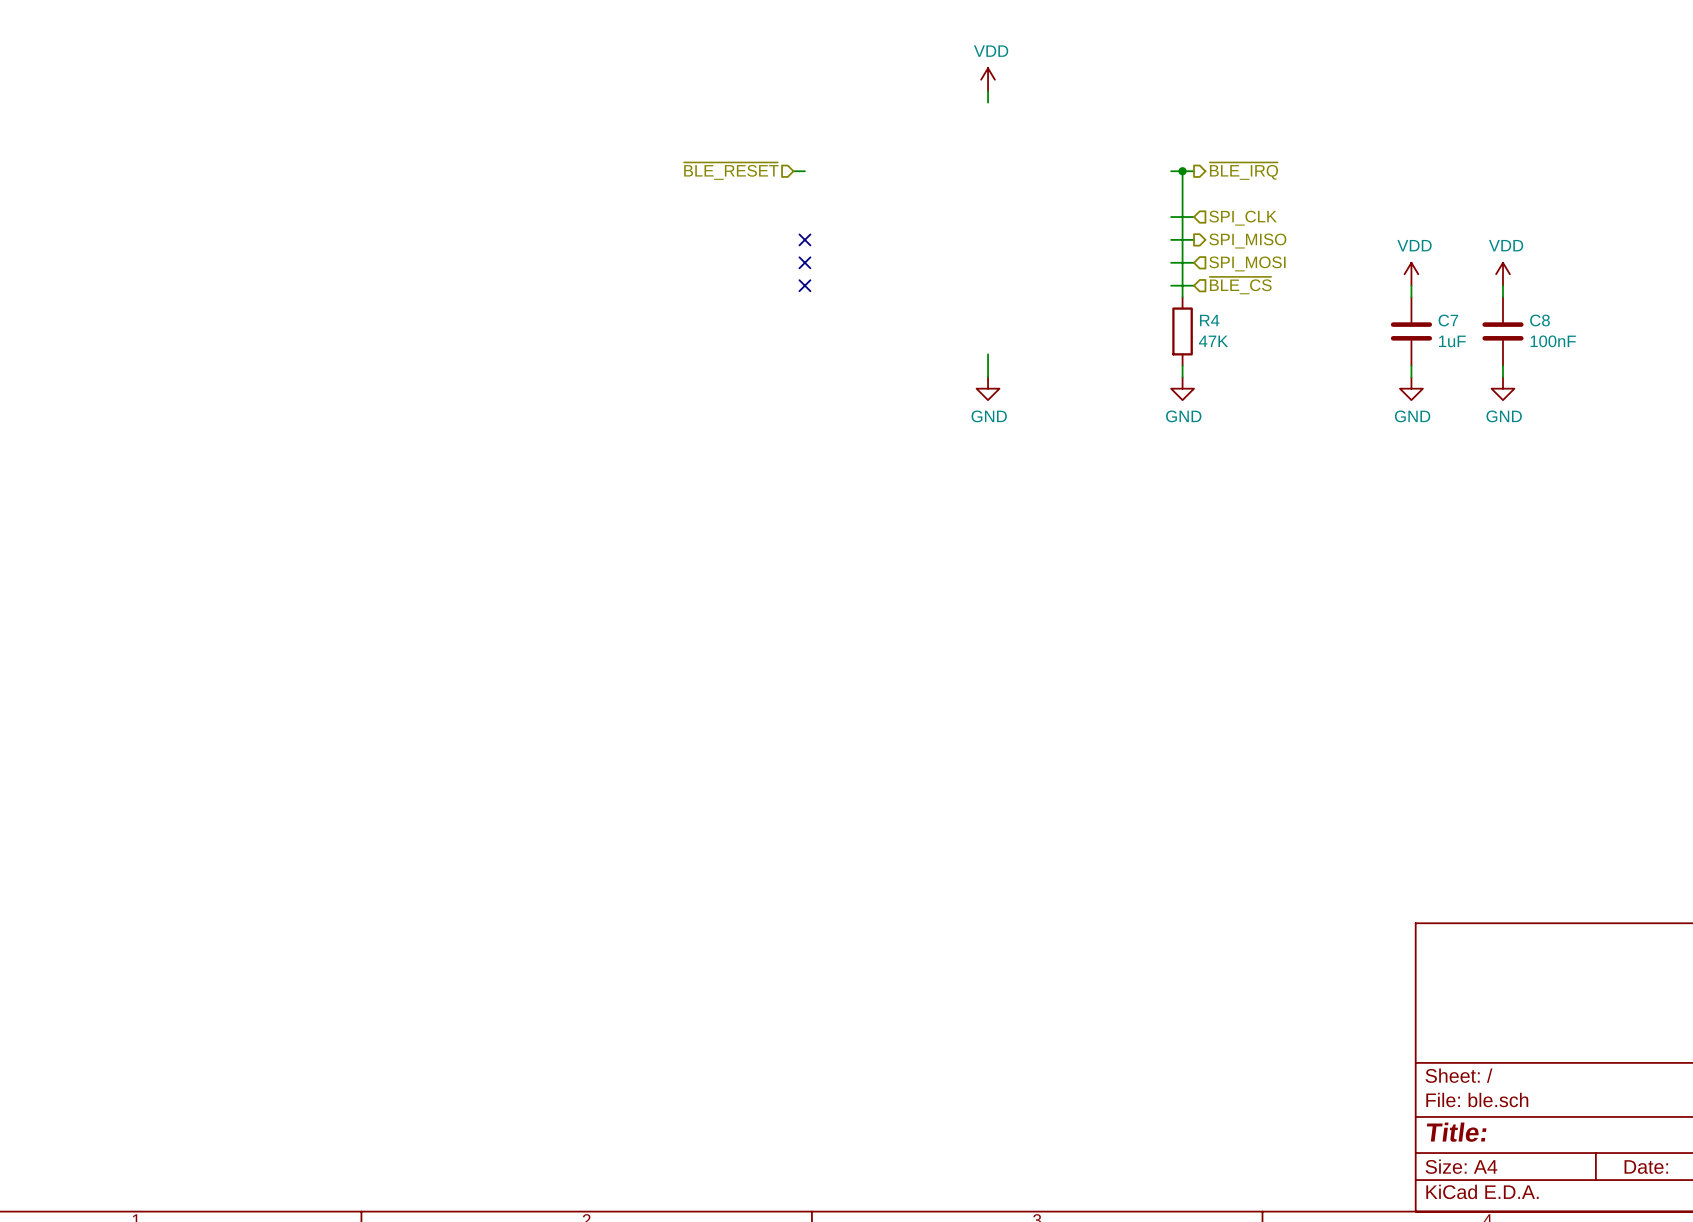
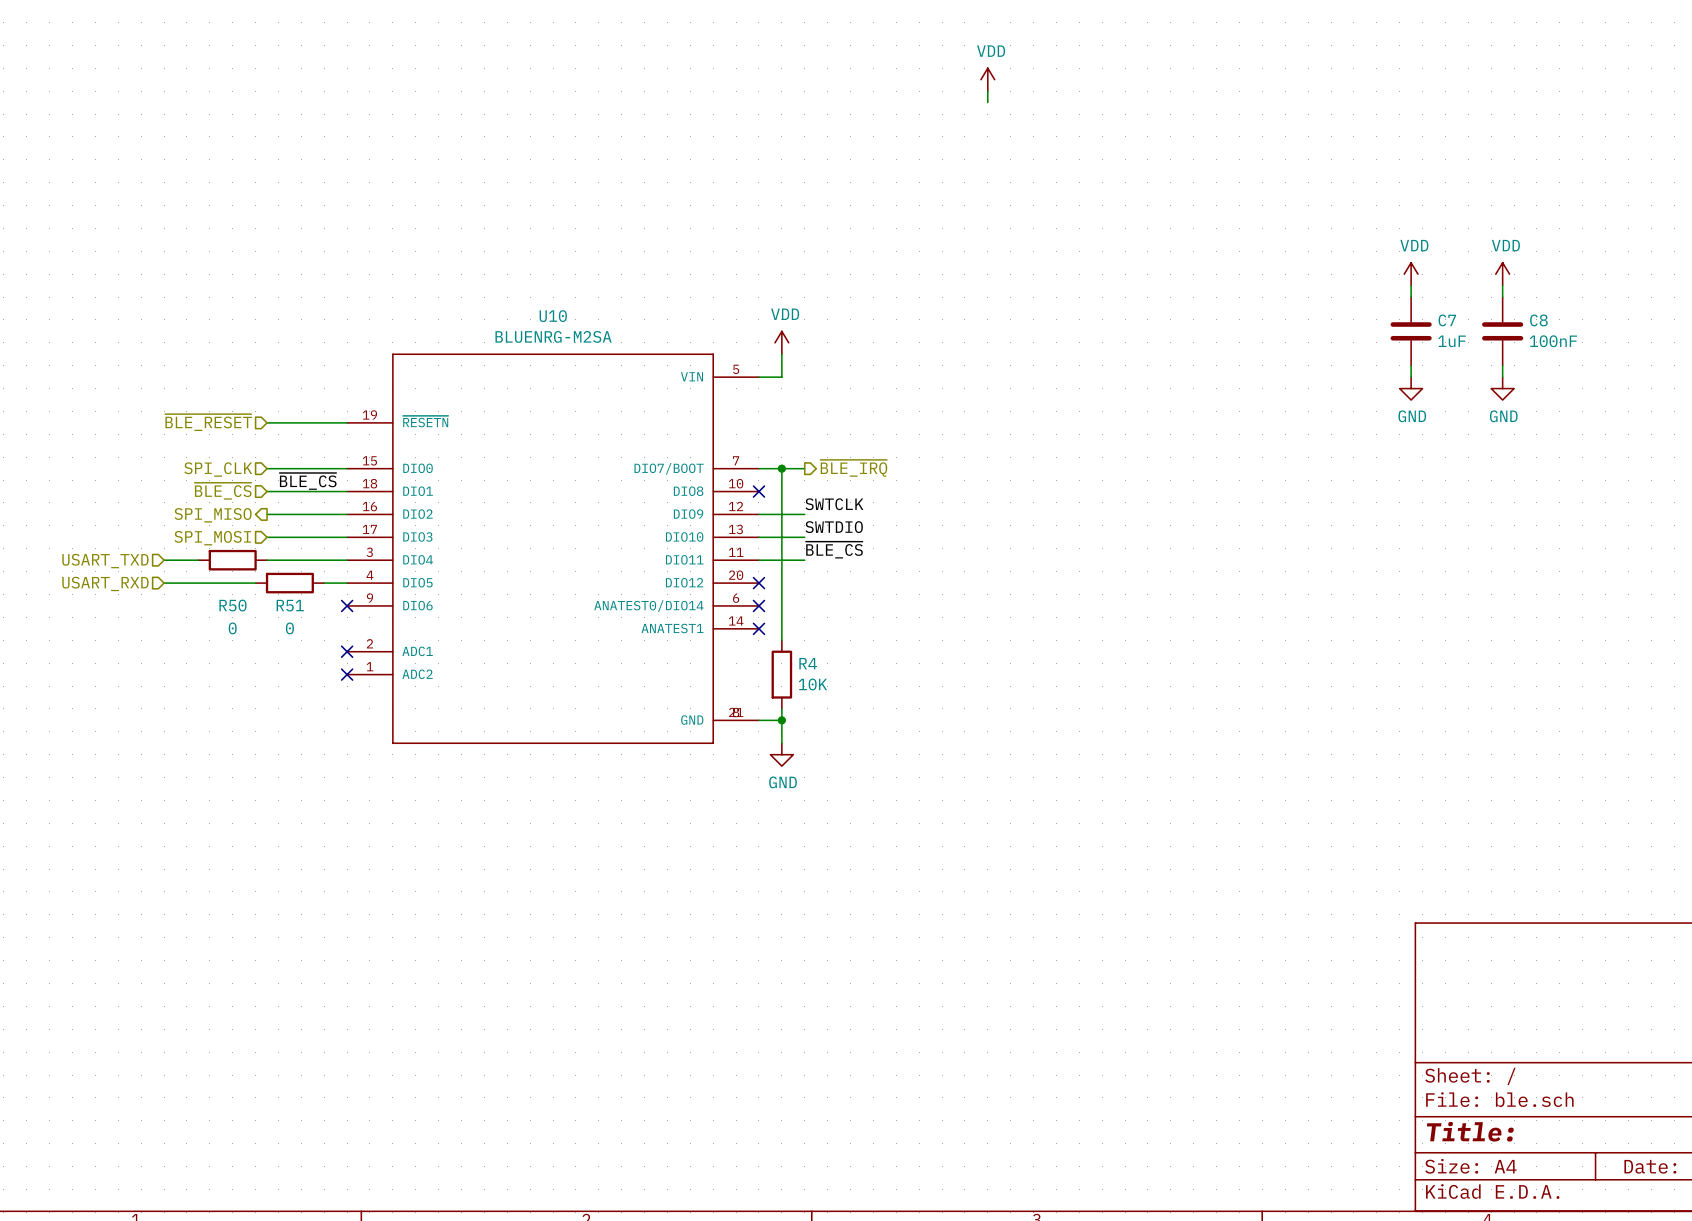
hierarchical label: ~{BLE_RESET} (731, 171) -> none
wire: (793, 171) (804, 171) -> none
wire: (1171, 171) (1194, 171) -> none
wire: (1182, 171) (1182, 297) -> none
junction: (1182, 171) -> none
hierarchical label: ~{BLE_IRQ} (1243, 171) -> none
wire: (1171, 217) (1194, 217) -> none
hierarchical label: SPI_CLK (1243, 218) -> none
no-connect mark: (804, 239) -> none
wire: (1171, 239) (1194, 239) -> none
hierarchical label: SPI_MISO (1247, 241) -> none
no-connect mark: (804, 262) -> none
wire: (1171, 262) (1194, 262) -> none
hierarchical label: SPI_MOSI (1247, 263) -> none
no-connect mark: (804, 285) -> none
wire: (1171, 285) (1194, 285) -> none
hierarchical label: ~{BLE_CS} (1240, 285) -> none
R4 position: (1182, 331) -> (781, 674)
R4 value: 47K (1213, 341) -> 10K (812, 684)
power symbol: none -> VDD (781, 342)
wire: none -> (781, 354) (781, 377) (758, 377)
wire: (988, 354) (988, 377) -> none
wire: (1182, 365) (1182, 377) -> none
power symbol: GND (988, 388) -> none
power symbol: GND (1182, 388) -> none
hierarchical label: none -> ~{BLE_RESET} (208, 422)
wire: none -> (267, 422) (347, 422)
wire: none -> (267, 468) (347, 468)
wire: none -> (758, 468) (804, 468)
wire: none -> (781, 468) (781, 640)
junction: none -> (781, 468)
hierarchical label: none -> ~{BLE_IRQ} (853, 468)
hierarchical label: none -> SPI_CLK (218, 469)
label: none -> ~{BLE_CS} (308, 481)
hierarchical label: none -> ~{BLE_CS} (223, 491)
wire: none -> (267, 491) (347, 491)
no-connect mark: none -> (758, 491)
label: none -> SWTCLK (834, 504)
wire: none -> (267, 514) (347, 514)
wire: none -> (758, 514) (804, 514)
hierarchical label: none -> SPI_MISO (213, 515)
label: none -> SWTDIO (834, 527)
wire: none -> (267, 537) (347, 537)
wire: none -> (758, 537) (804, 537)
hierarchical label: none -> SPI_MOSI (212, 538)
U10: none -> BLUENRG-M2SA (553, 548)
label: none -> ~{BLE_CS} (834, 550)
wire: none -> (164, 560) (198, 560)
R50: none -> 0 (232, 560)
wire: none -> (267, 560) (347, 560)
wire: none -> (758, 560) (804, 560)
hierarchical label: none -> USART_TXD (105, 561)
wire: none -> (164, 583) (255, 583)
R51: none -> 0 (289, 583)
wire: none -> (324, 583) (347, 583)
no-connect mark: none -> (758, 583)
hierarchical label: none -> USART_RXD (105, 583)
no-connect mark: none -> (347, 605)
no-connect mark: none -> (758, 605)
no-connect mark: none -> (758, 628)
no-connect mark: none -> (347, 651)
no-connect mark: none -> (347, 674)
wire: none -> (781, 708) (781, 743)
wire: none -> (758, 720) (781, 720)
junction: none -> (781, 720)
power symbol: none -> GND (781, 754)

